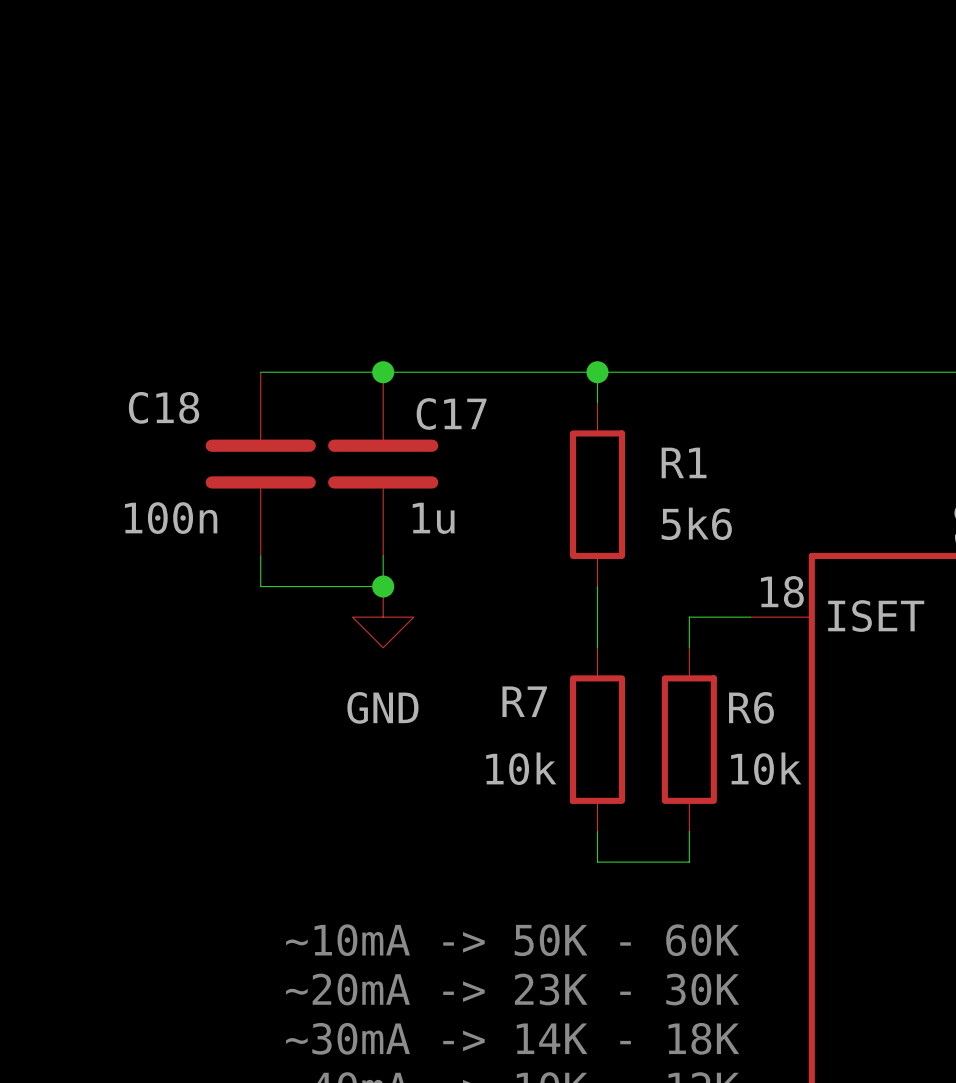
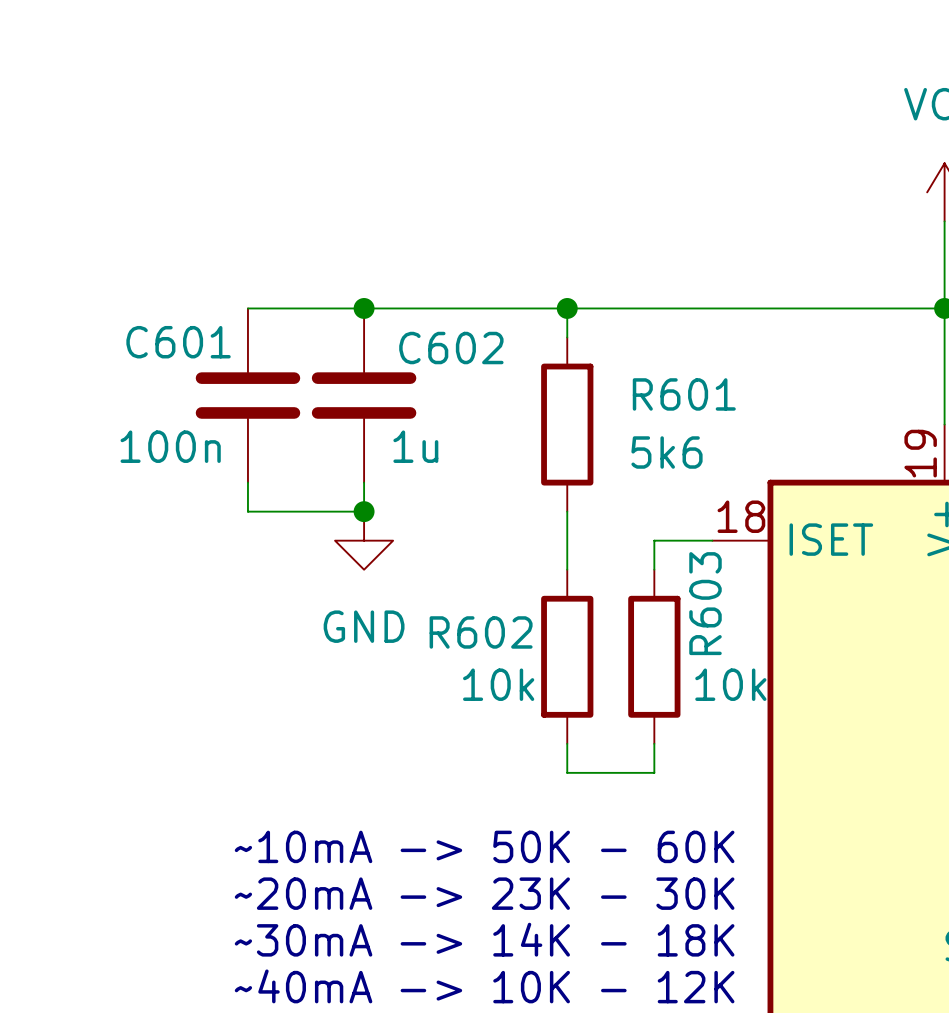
C18 name: C18 (164, 407) -> C601 (178, 342)
C17 name: C17 (451, 413) -> C602 (451, 348)
R1 name: R1 (684, 462) -> R601 (684, 394)
R7 name: R7 (524, 701) -> R602 (481, 632)
R6 name: R6 (751, 707) -> R603 (705, 603)

